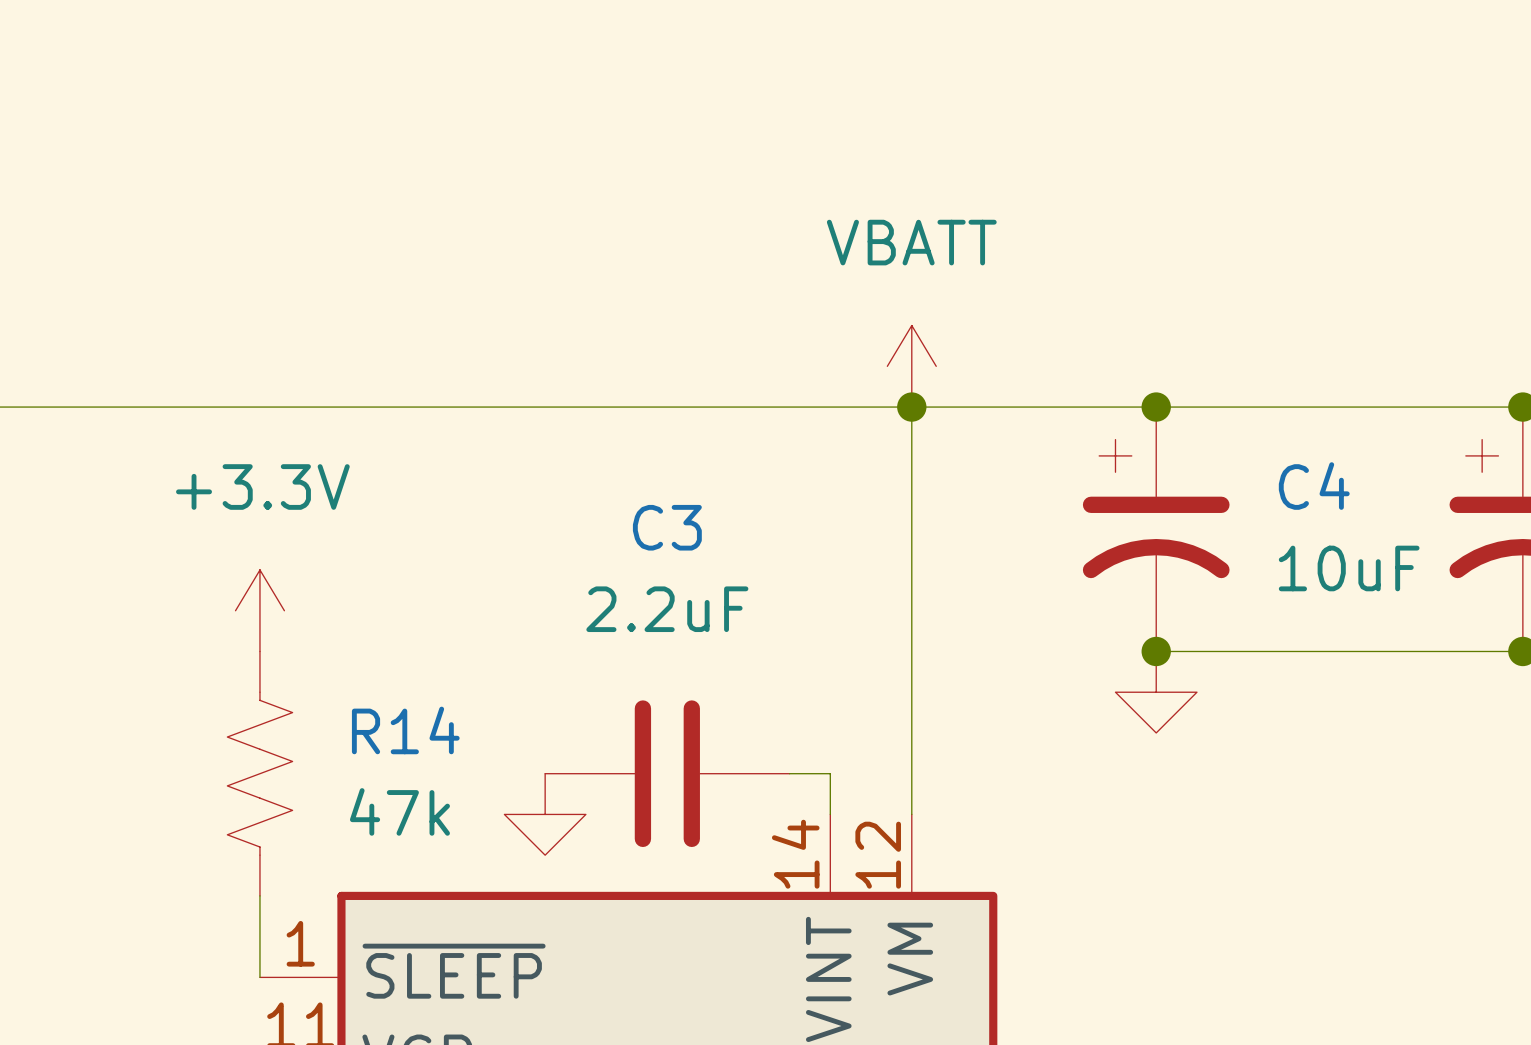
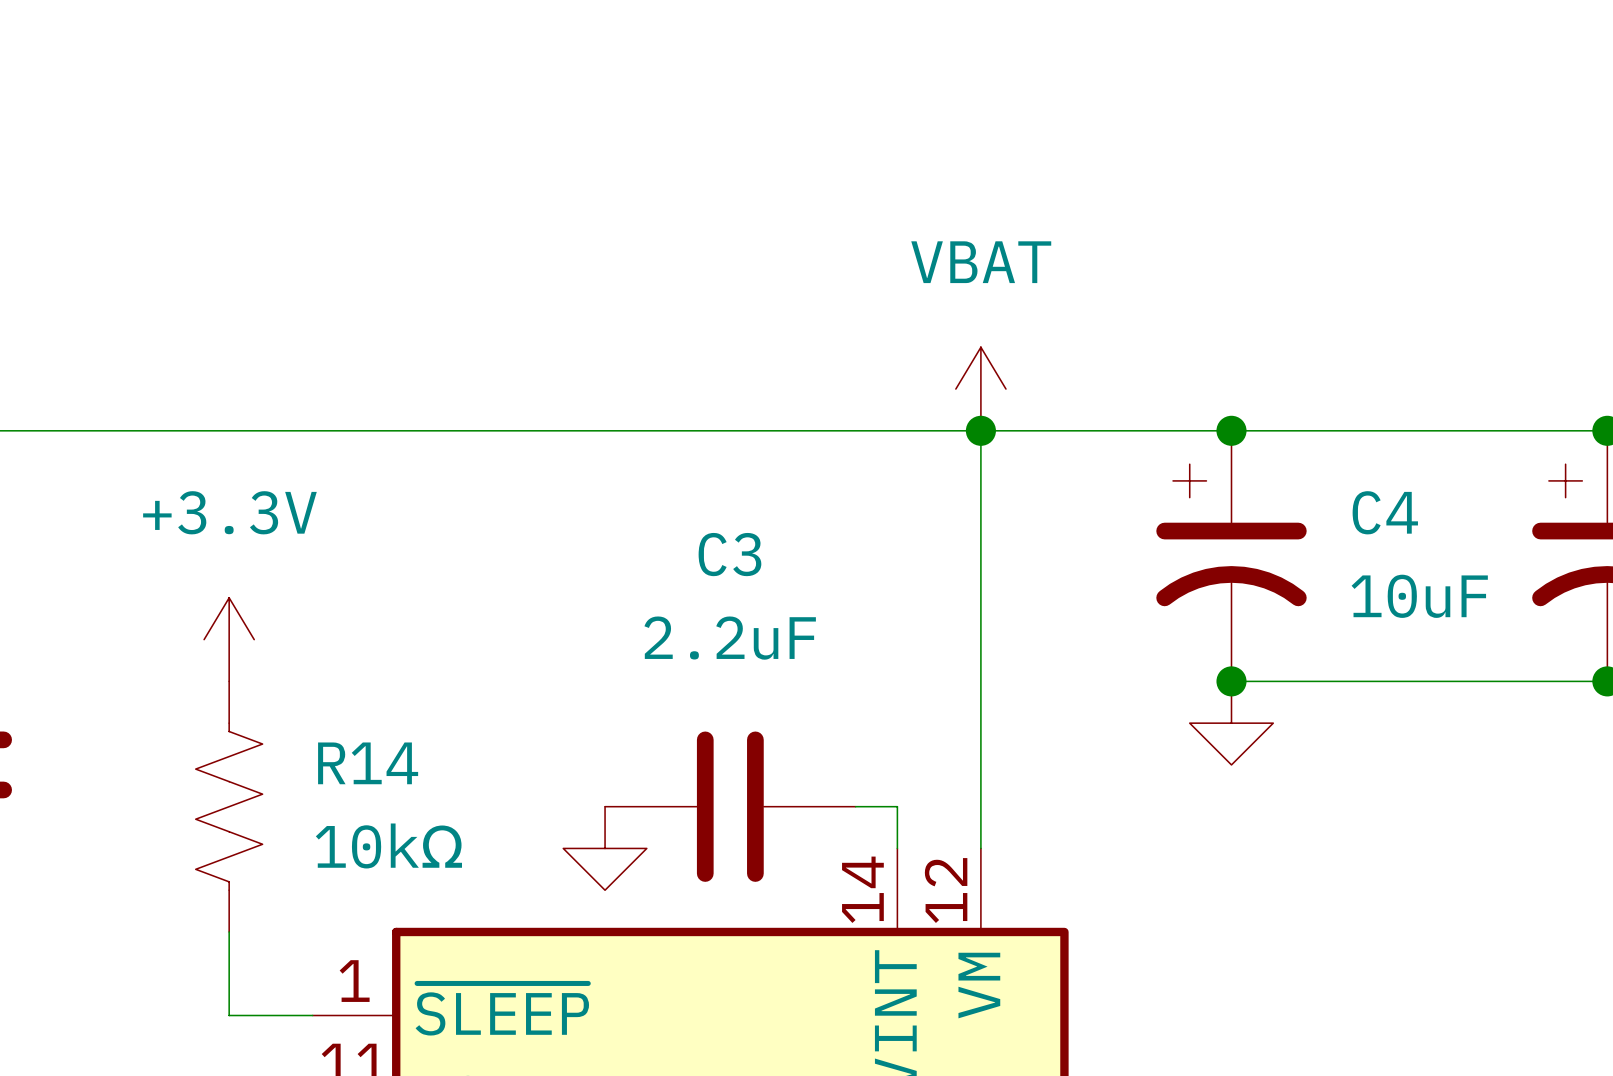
power symbol: VBATT (911, 366) -> VBAT (980, 389)
power symbol position: +3.3V (259, 610) -> +3.3V (229, 639)
R14 position: (259, 773) -> (229, 806)
R14 value: 47k (399, 811) -> 10kΩ (388, 845)
wire: (259, 895) (259, 977) -> (229, 931) (229, 1015) (312, 1015)

